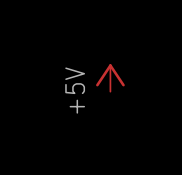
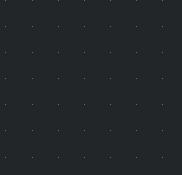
power symbol: +5V (110, 77) -> none

